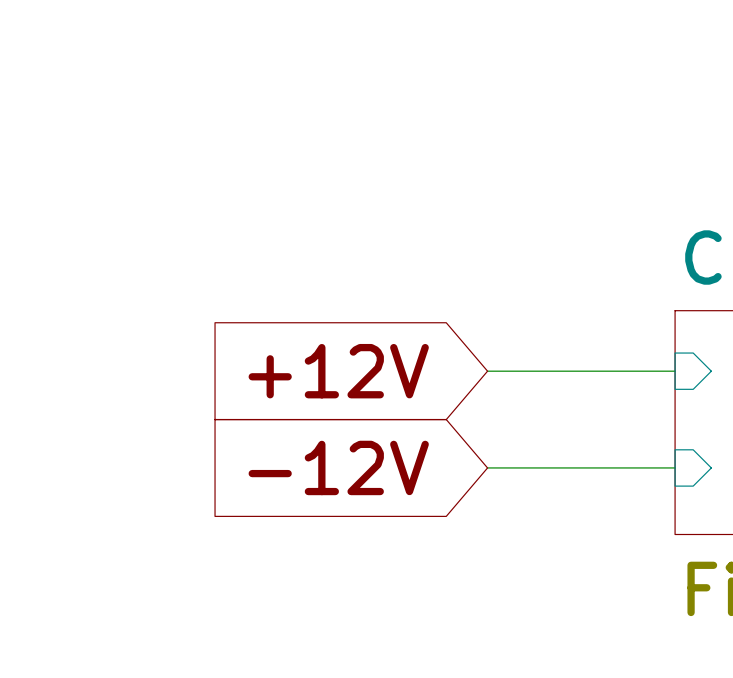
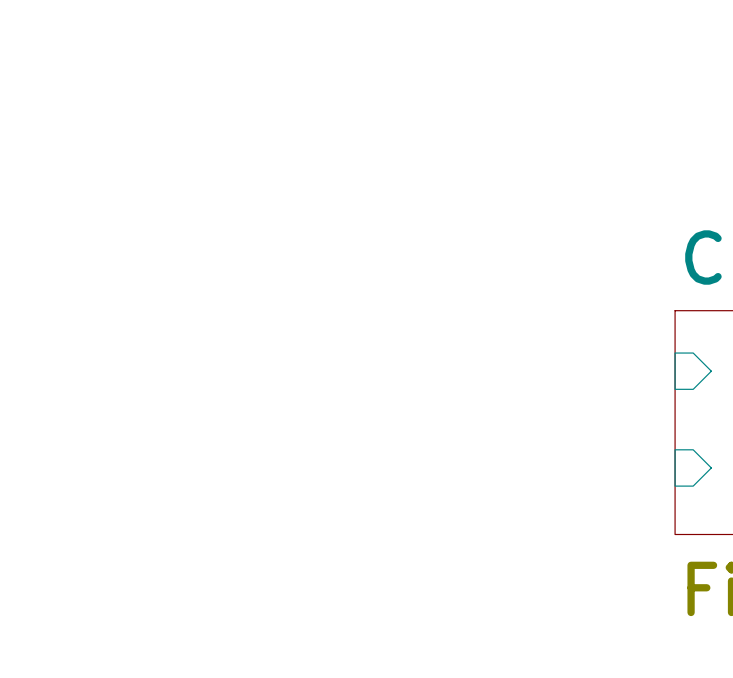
global label: +12V (338, 371) -> none
wire: (487, 371) (675, 371) -> none
global label: -12V (338, 467) -> none
wire: (487, 467) (675, 467) -> none

